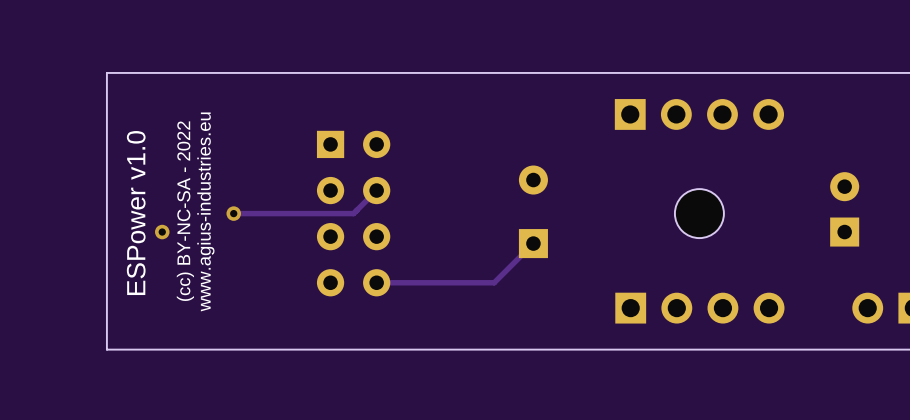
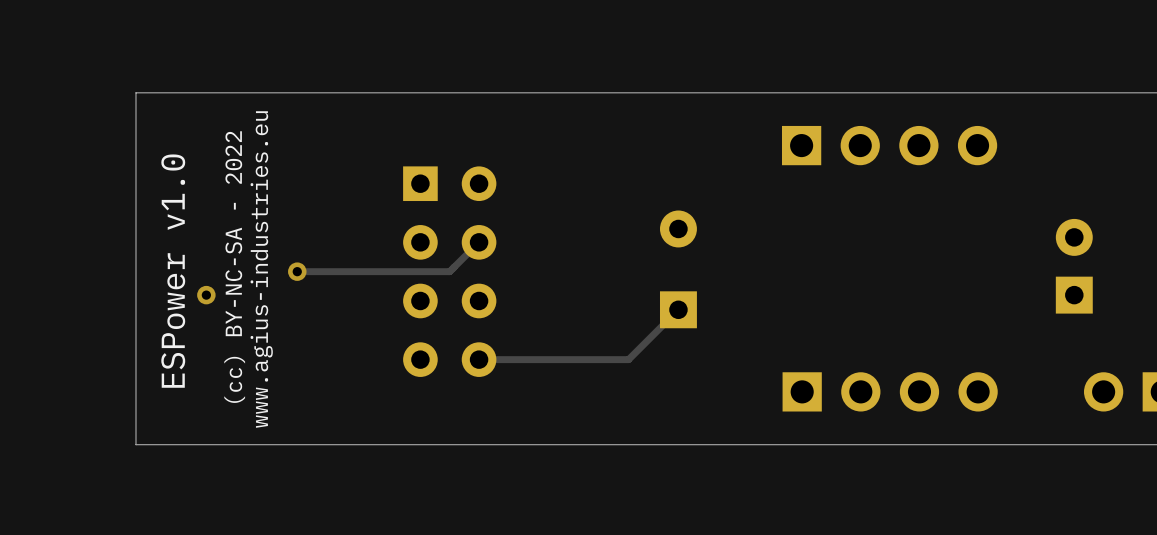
part: (699, 213) -> none

